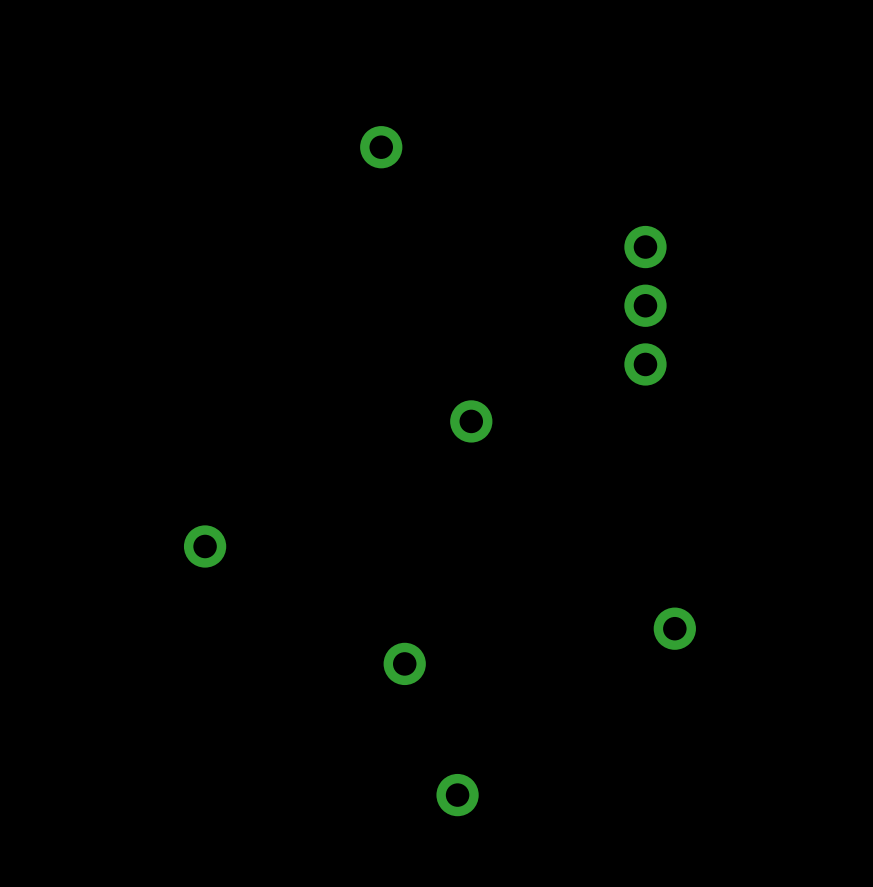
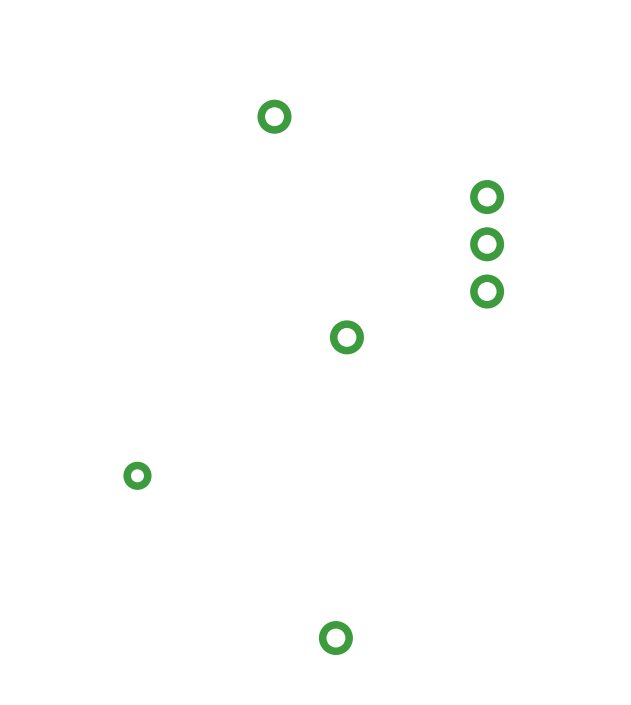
via: (205, 546) -> none
via: none -> (137, 475)
via: (674, 628) -> none
via: (404, 663) -> none

